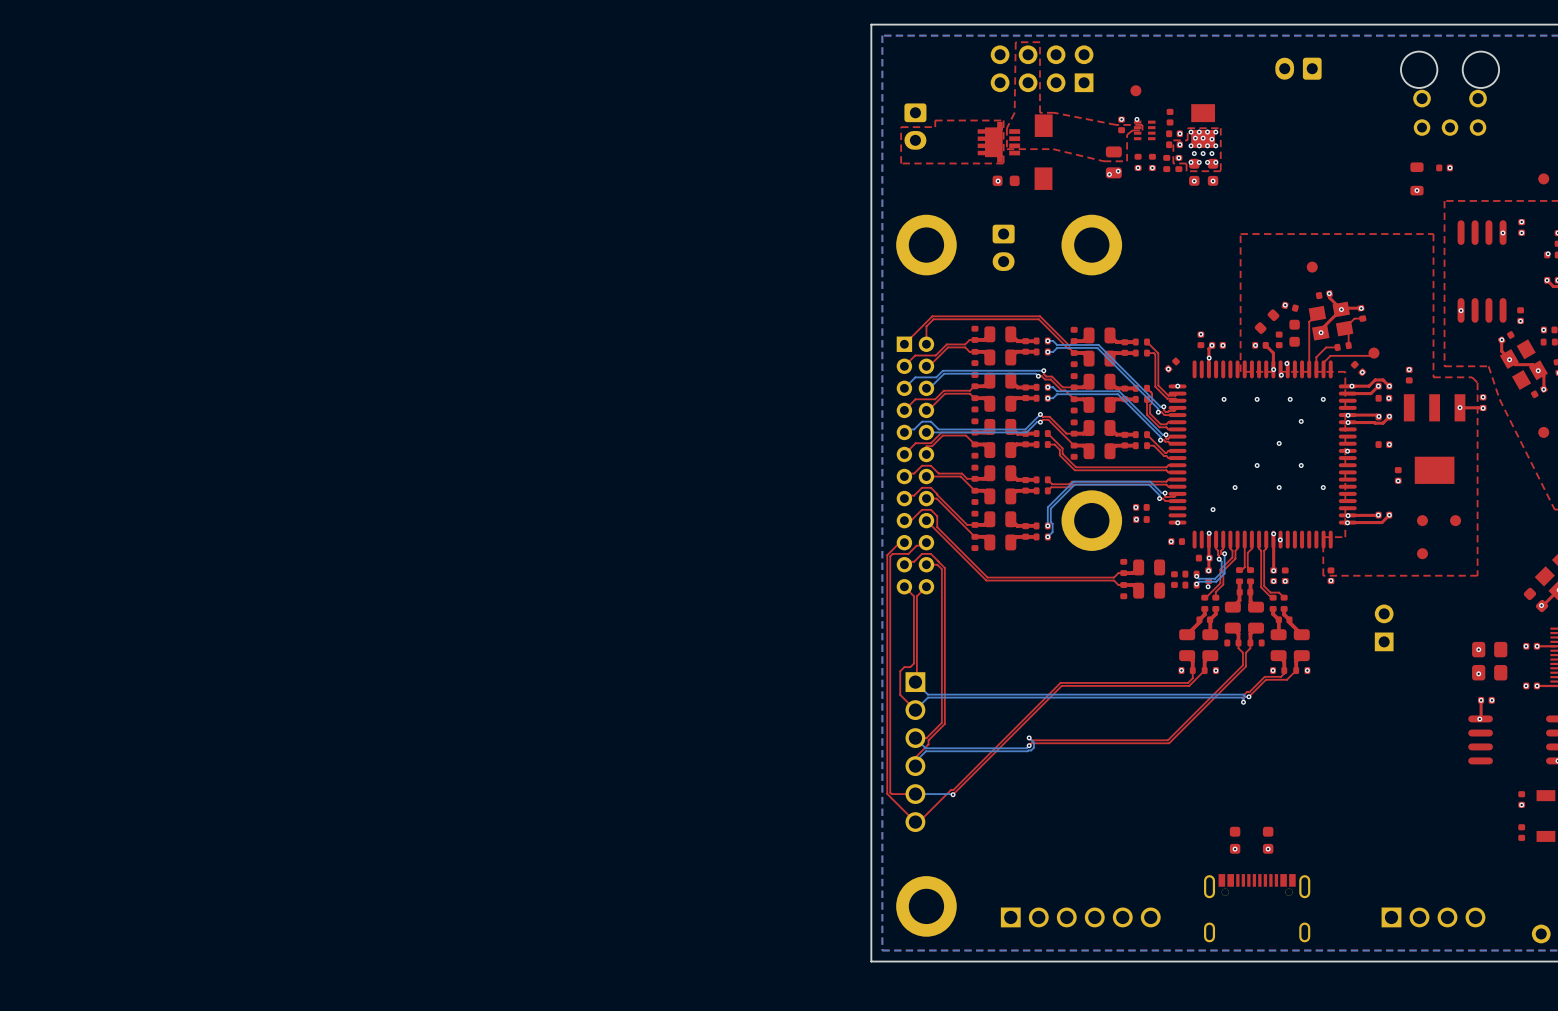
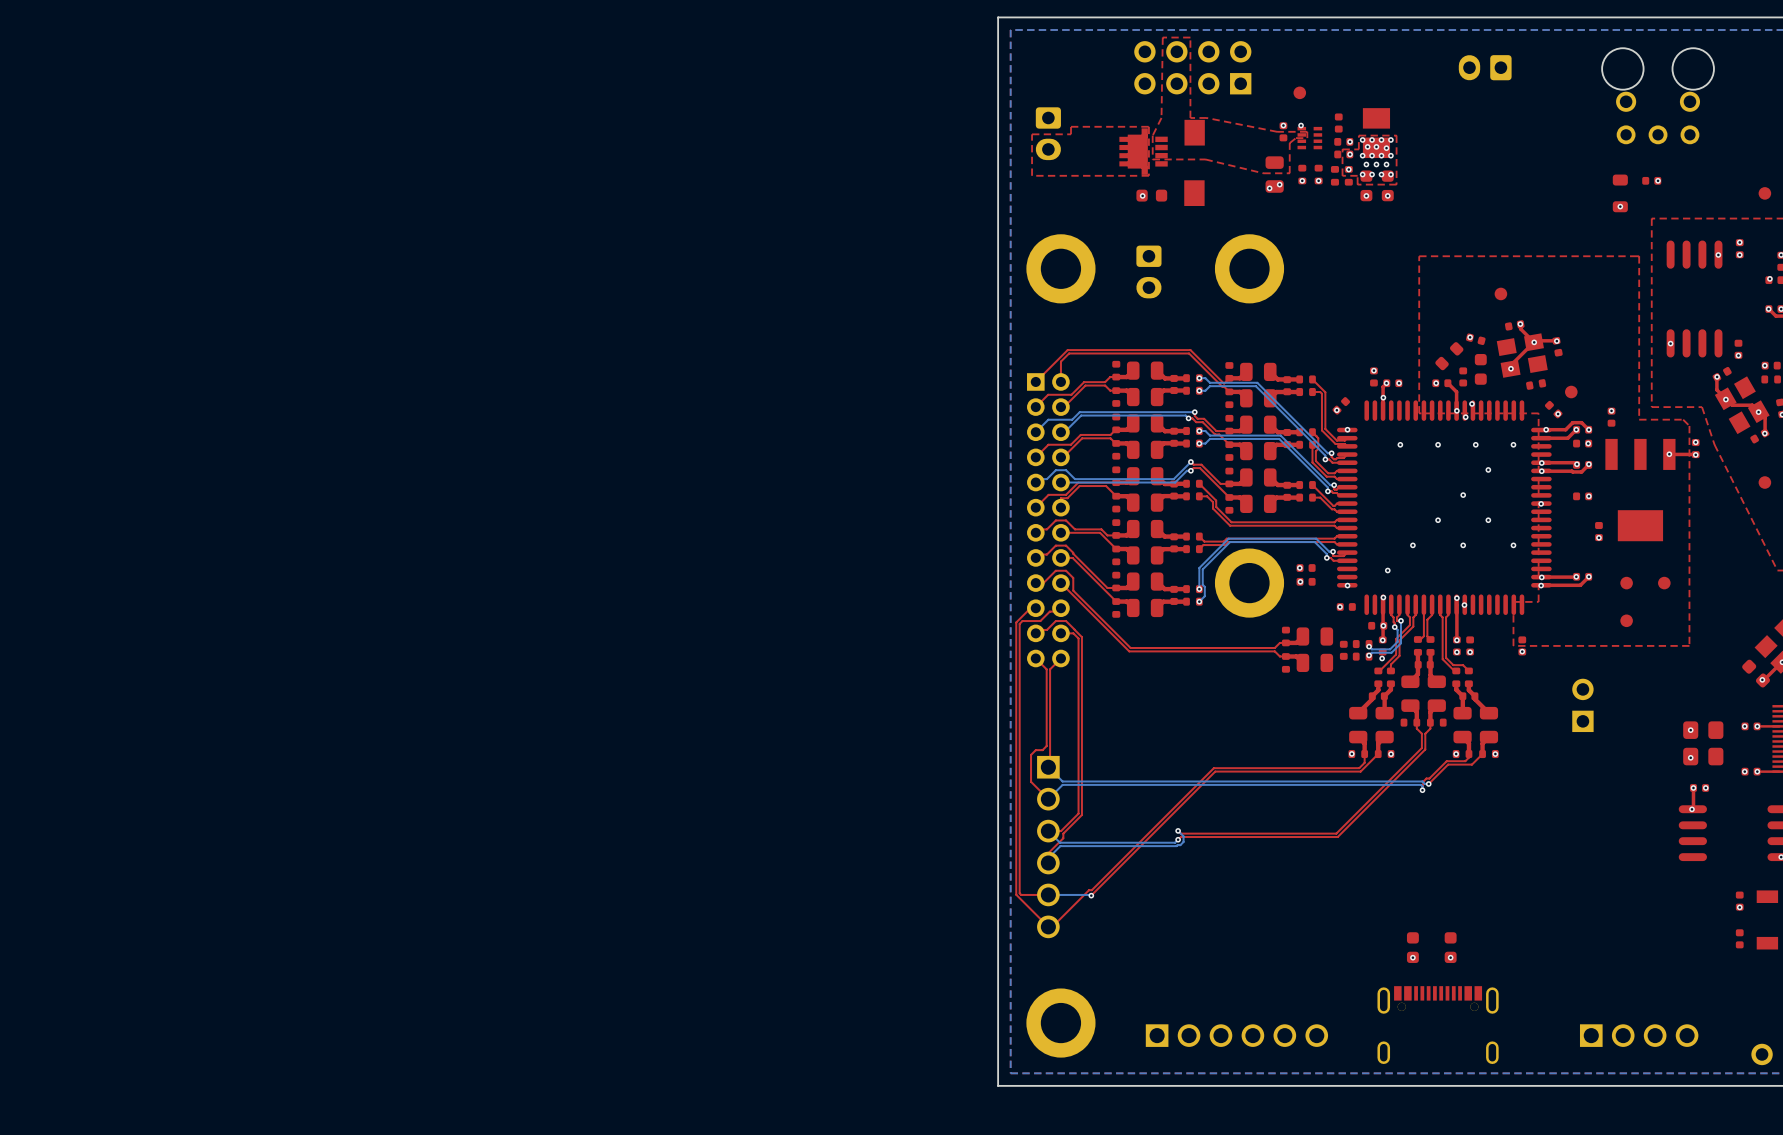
top track: (1317, 313) (1309, 321) (1309, 369) -> none
top track: (1362, 318) (1354, 318) (1344, 328) (1348, 332) (1348, 345) -> none
top track: (1337, 347) (1326, 347) (1316, 357) (1316, 369) -> none
top track: (1373, 353) (1371, 355) (1330, 355) (1323, 362) (1323, 369) -> none

